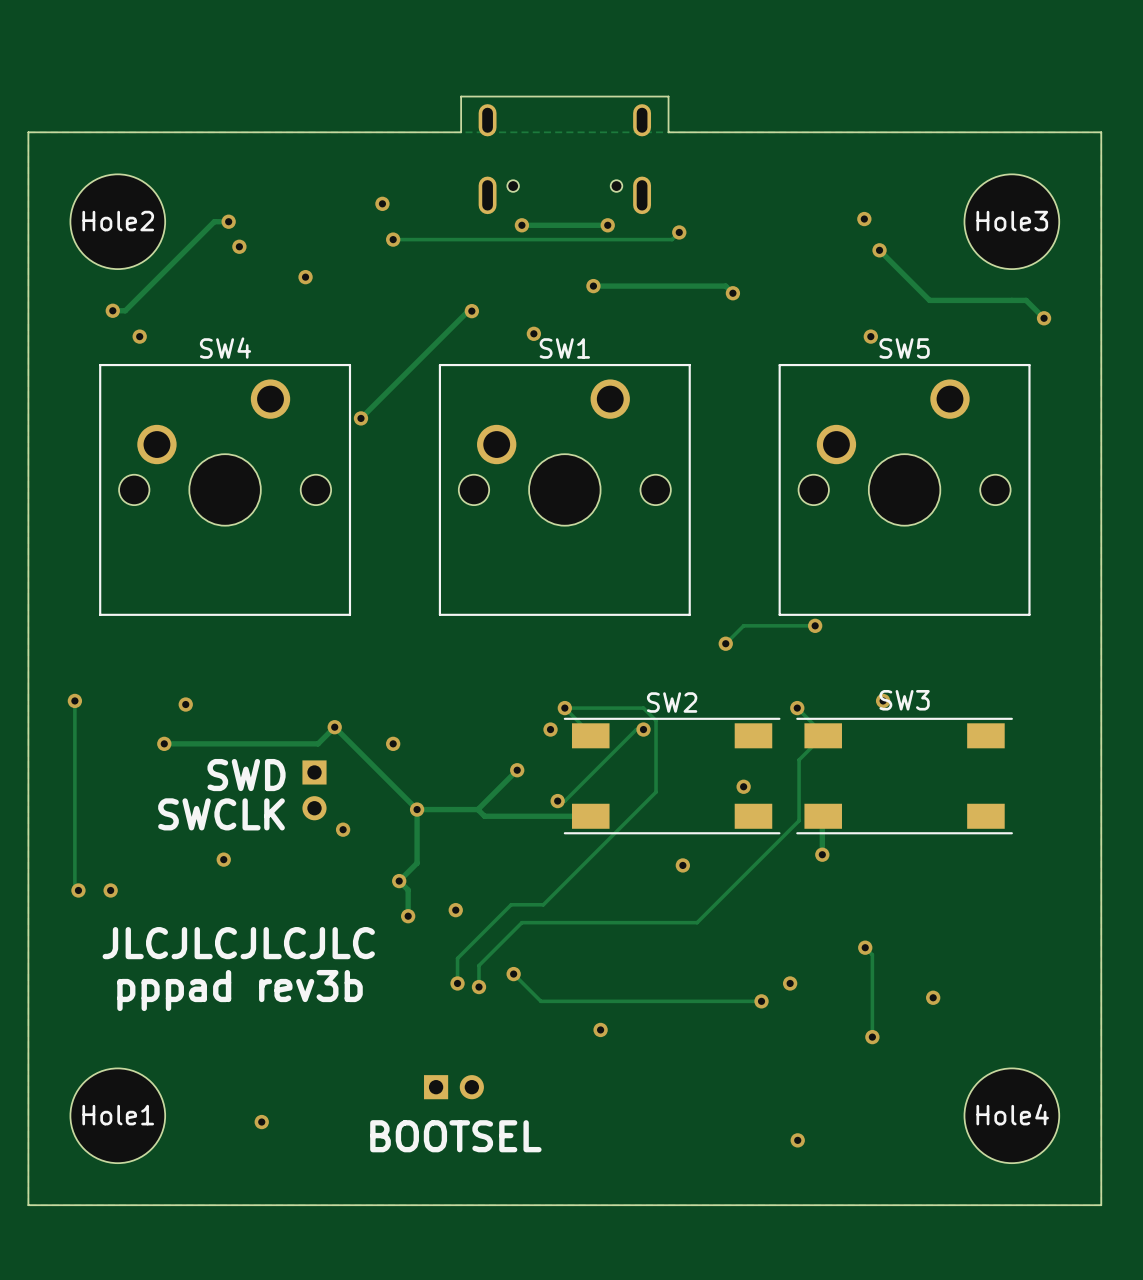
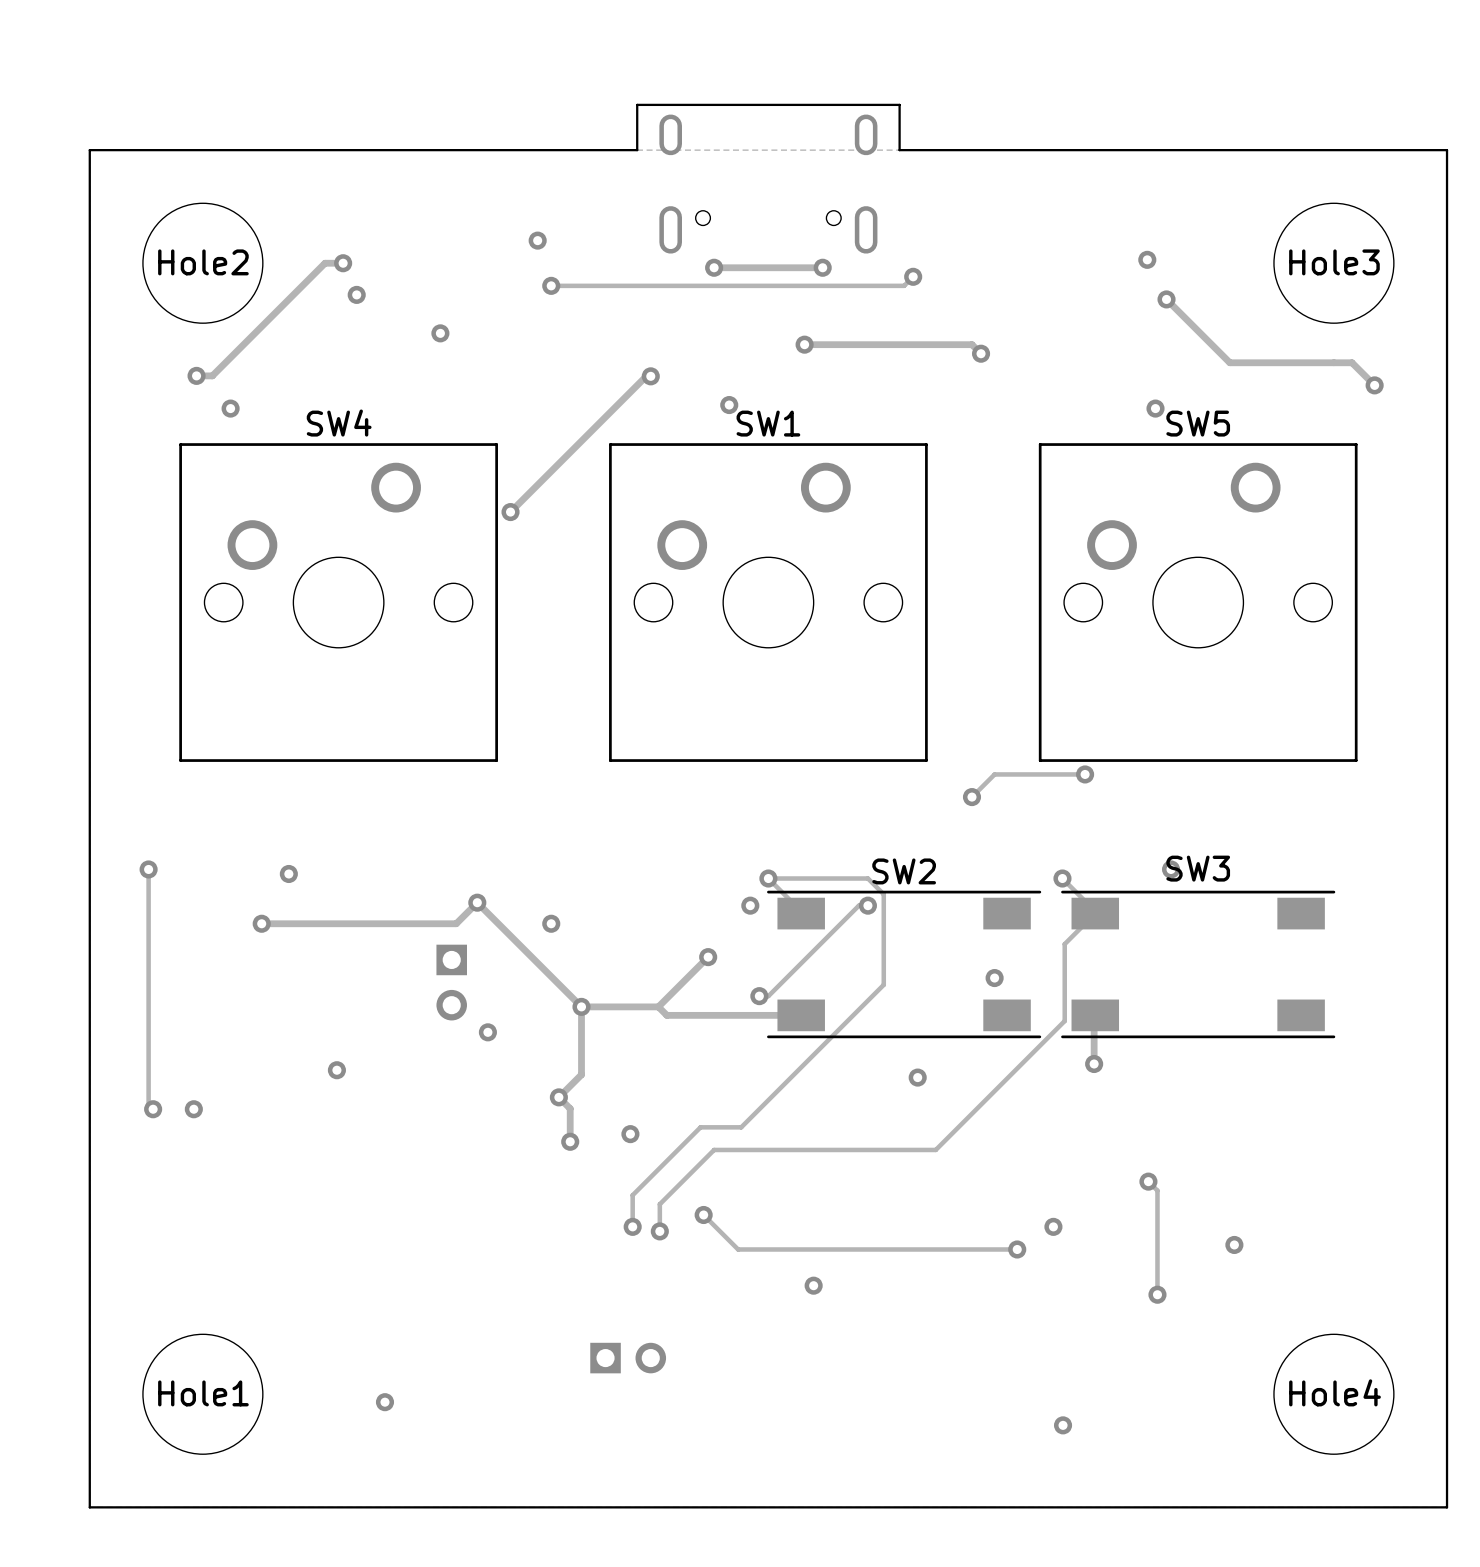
text: SWD (246, 775) -> none
text: SWCLK (221, 814) -> none
text: JLCJLCJLCJLC (238, 943) -> none
text: pppad rev3b (240, 990) -> none
text: BOOTSEL (455, 1136) -> none

